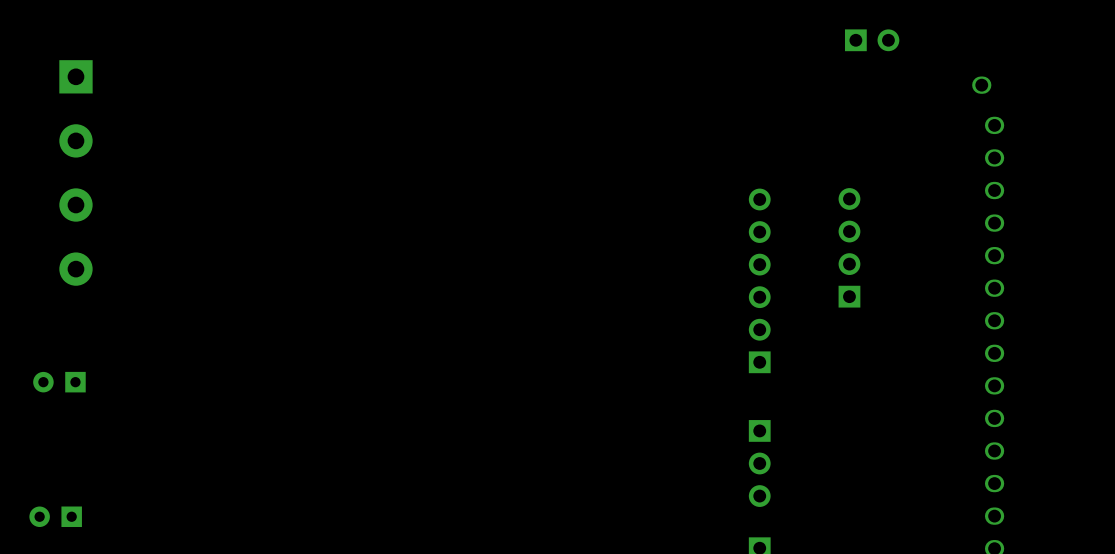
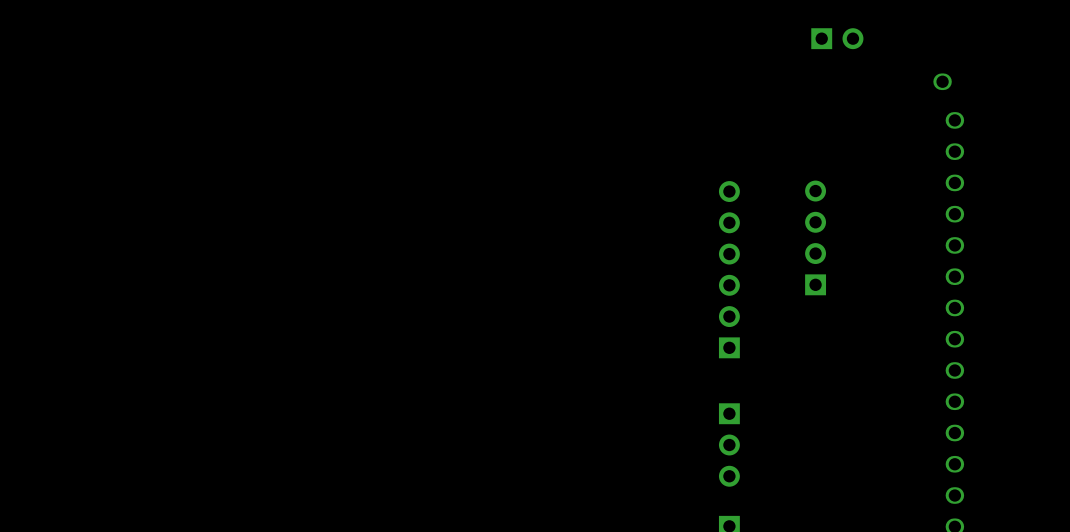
part: (75, 172) -> none
part: (59, 382) -> none
part: (55, 516) -> none

